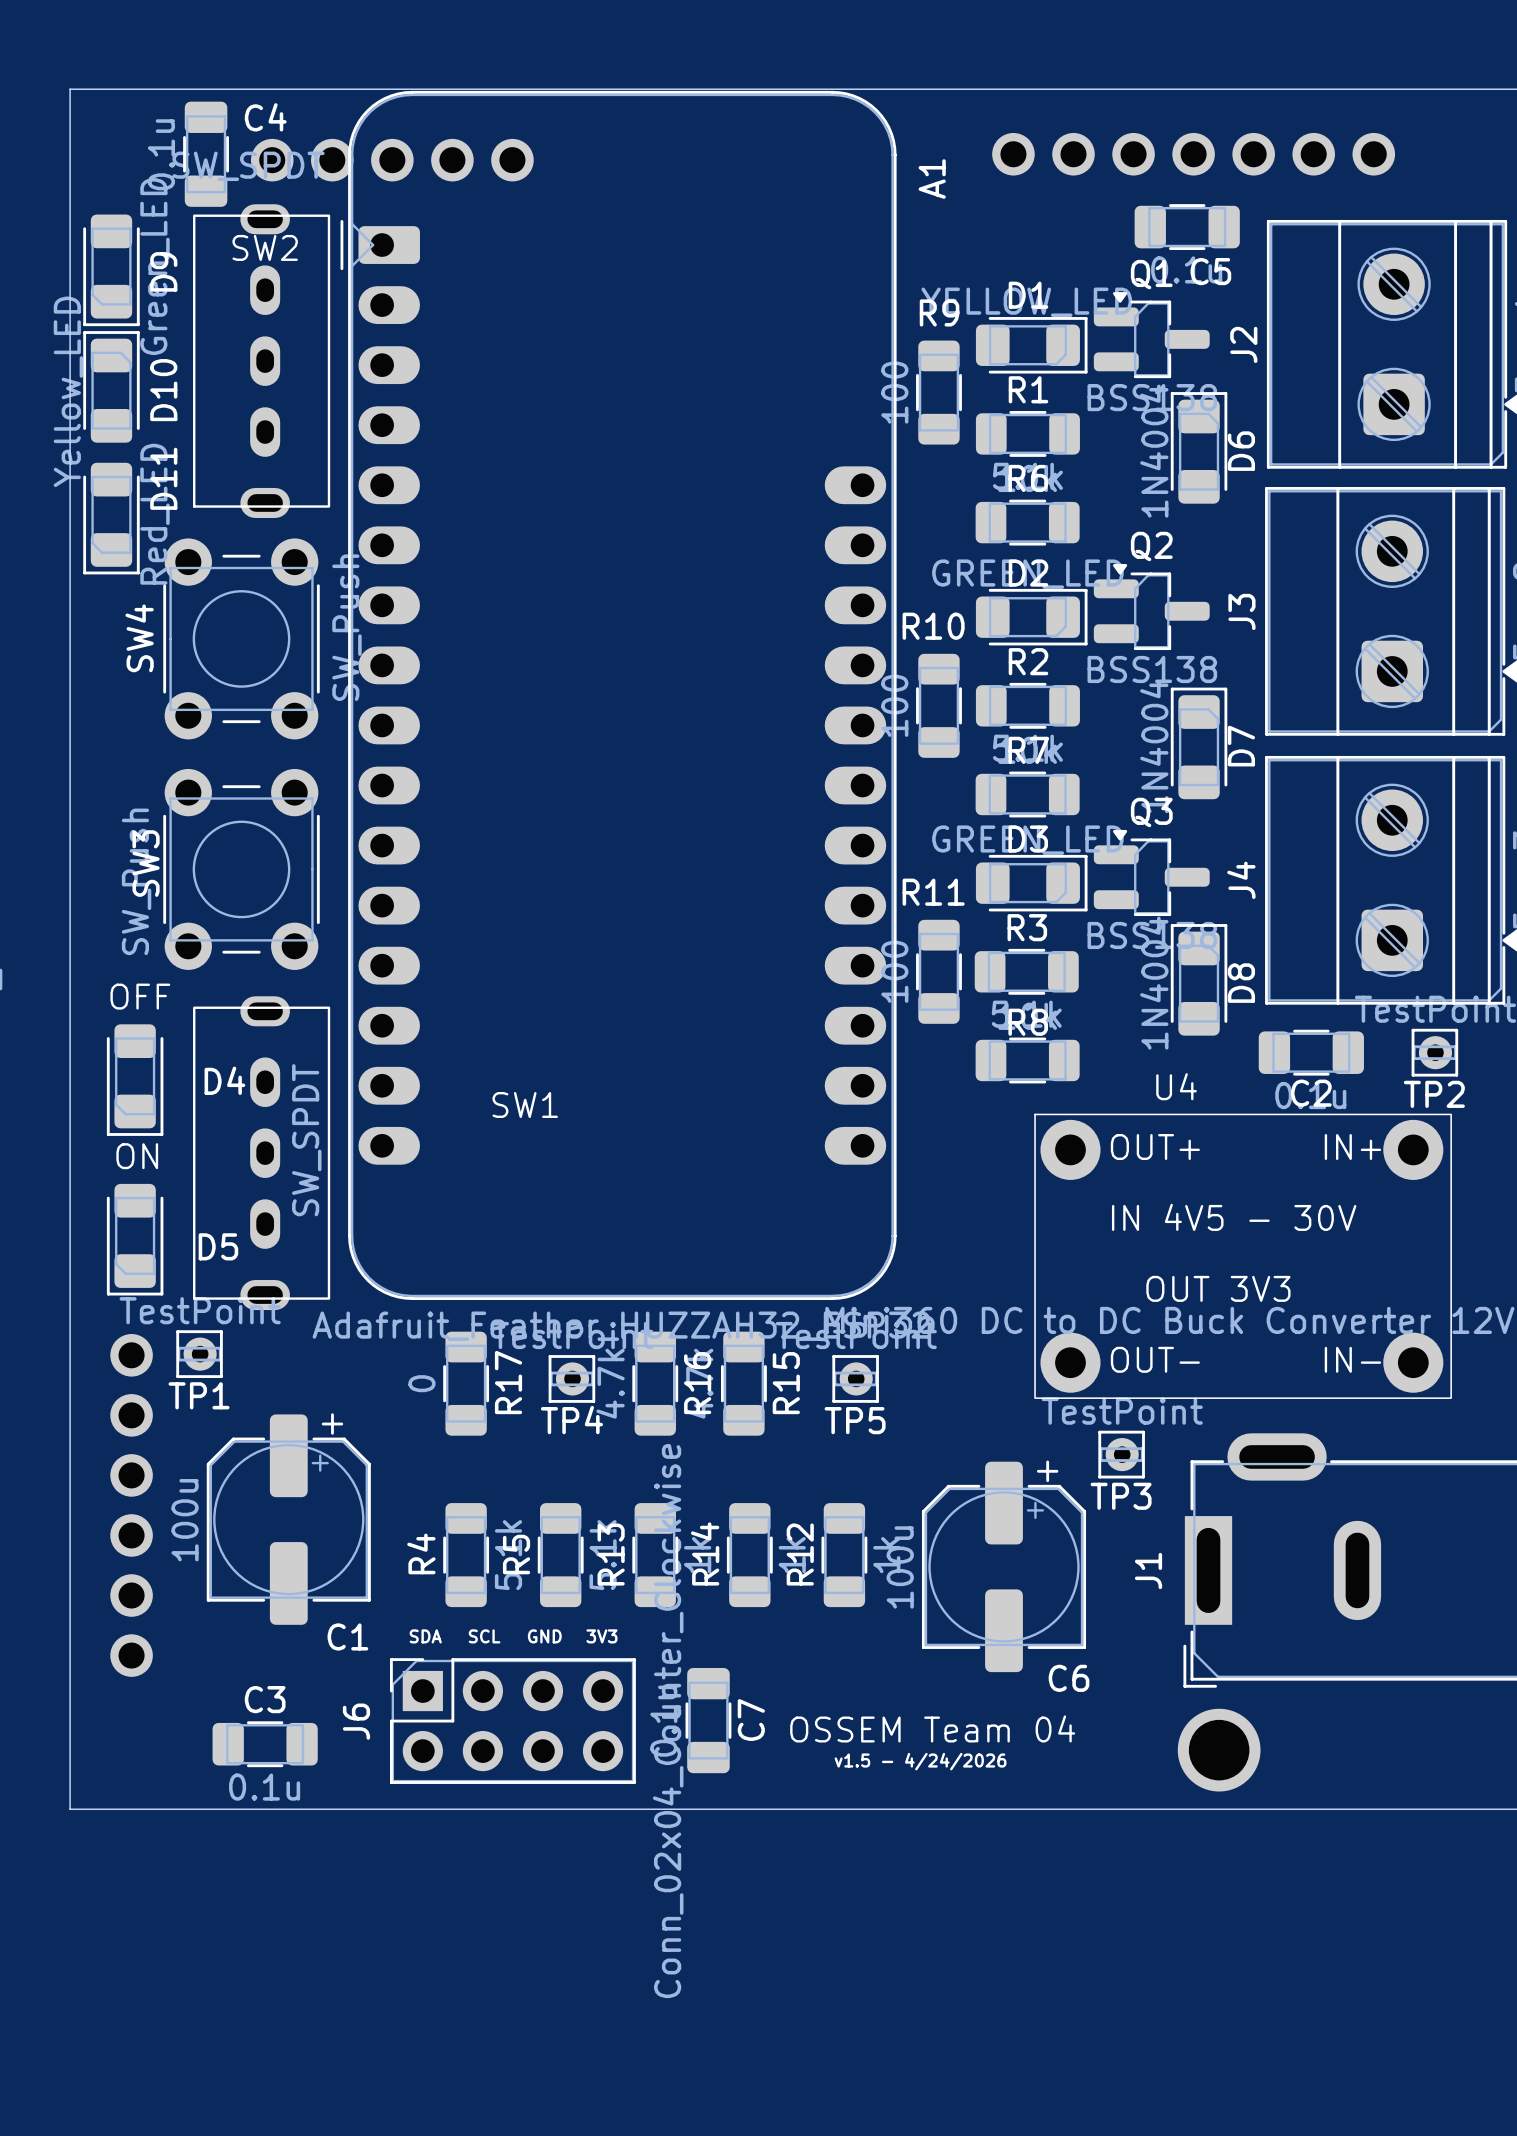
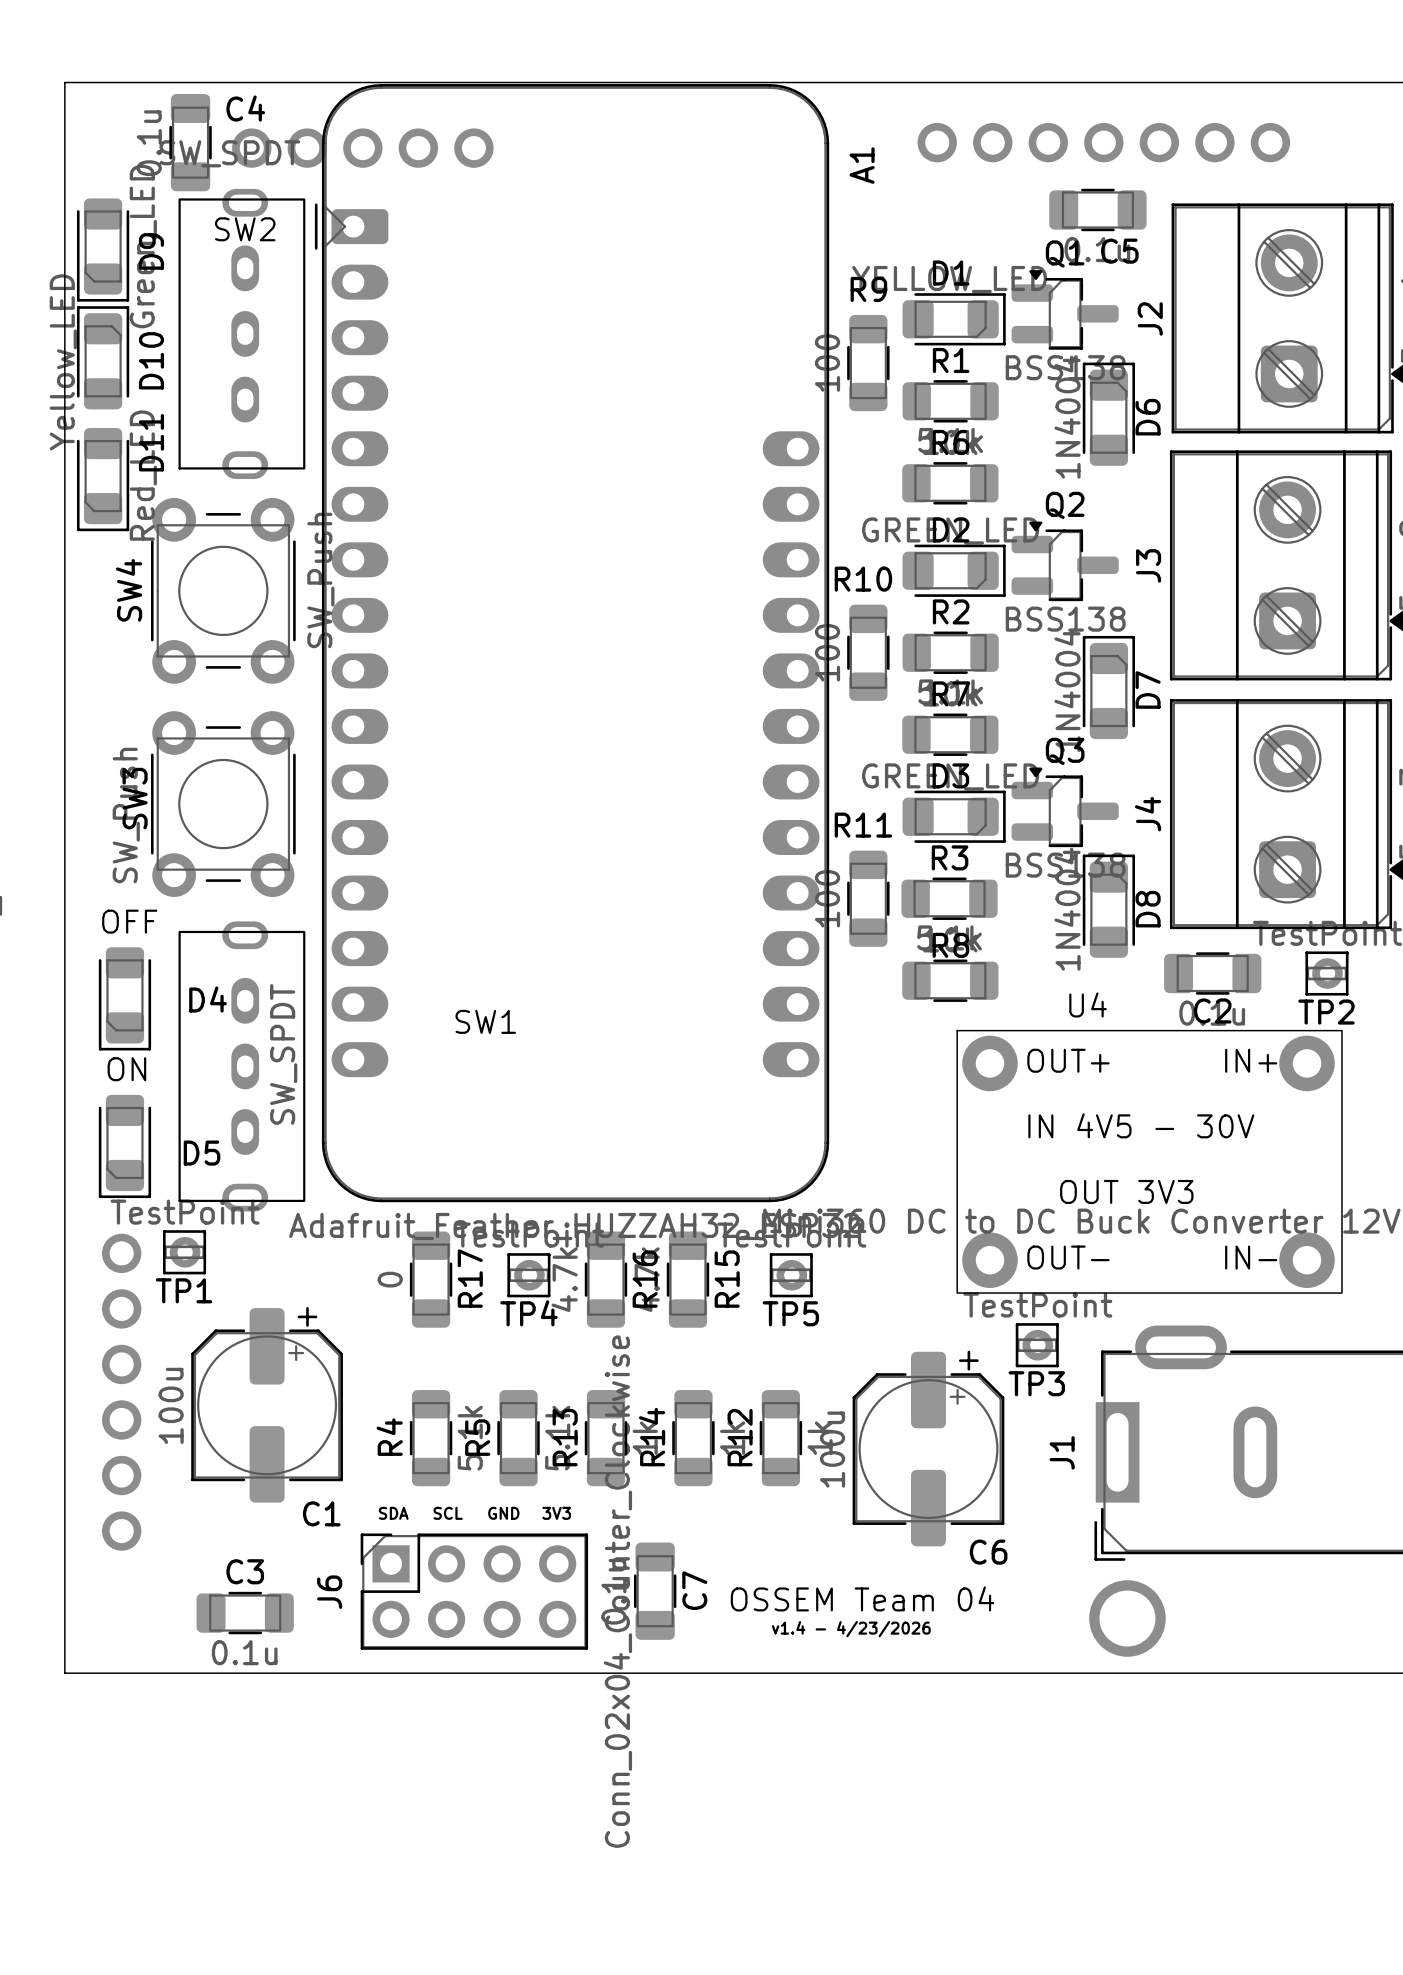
text: v1.5 - 4/24/2026 (920, 1761) -> v1.4 - 4/23/2026 (851, 1629)

